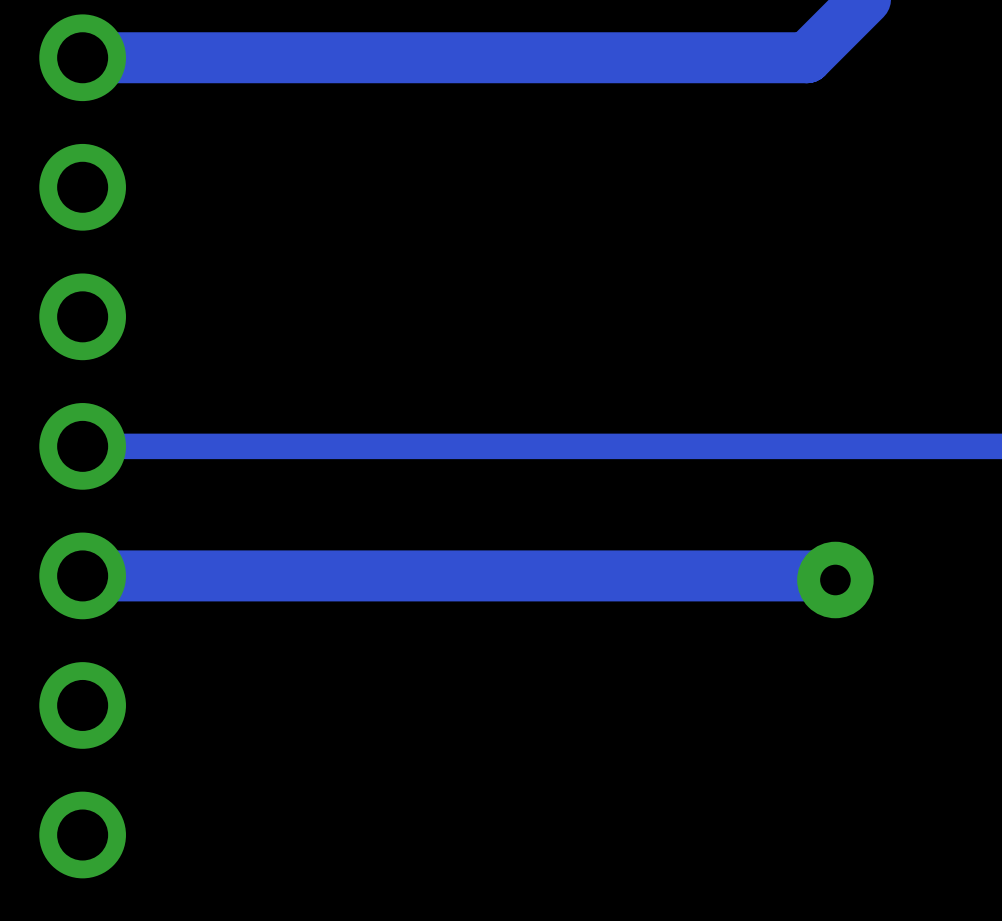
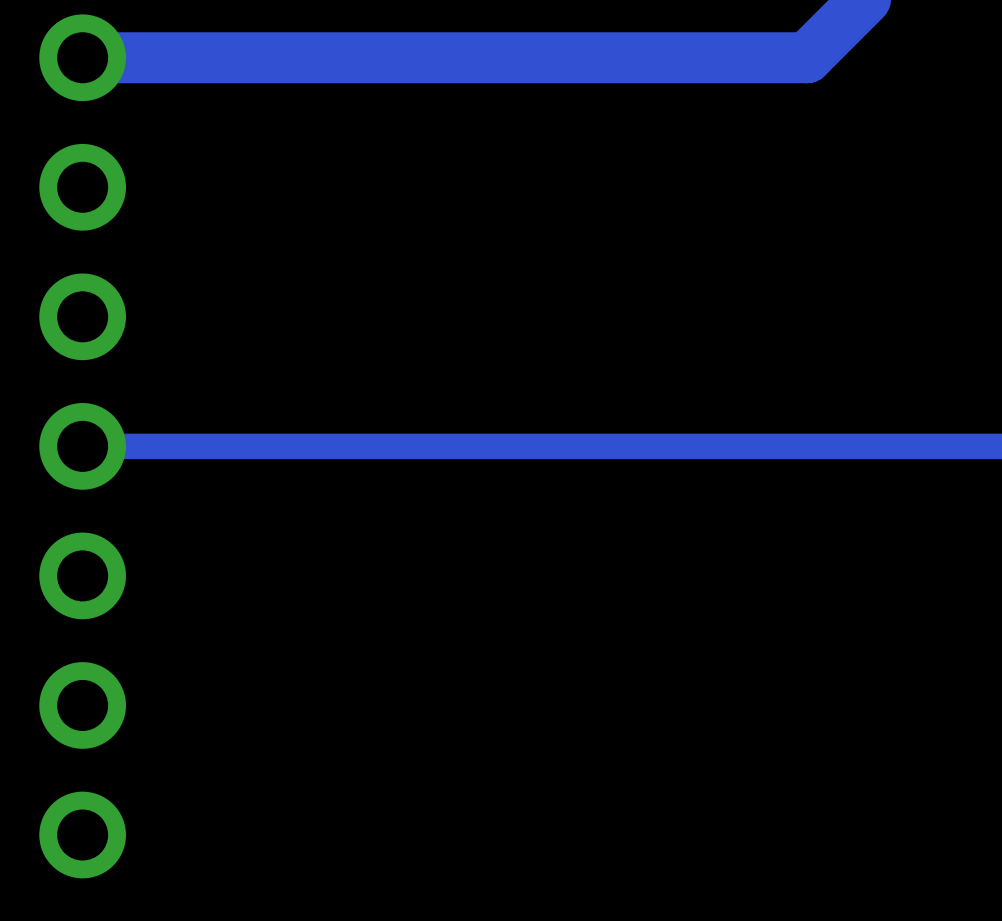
track: (82, 575) (831, 575) (835, 580) -> none
via: (835, 580) -> none

